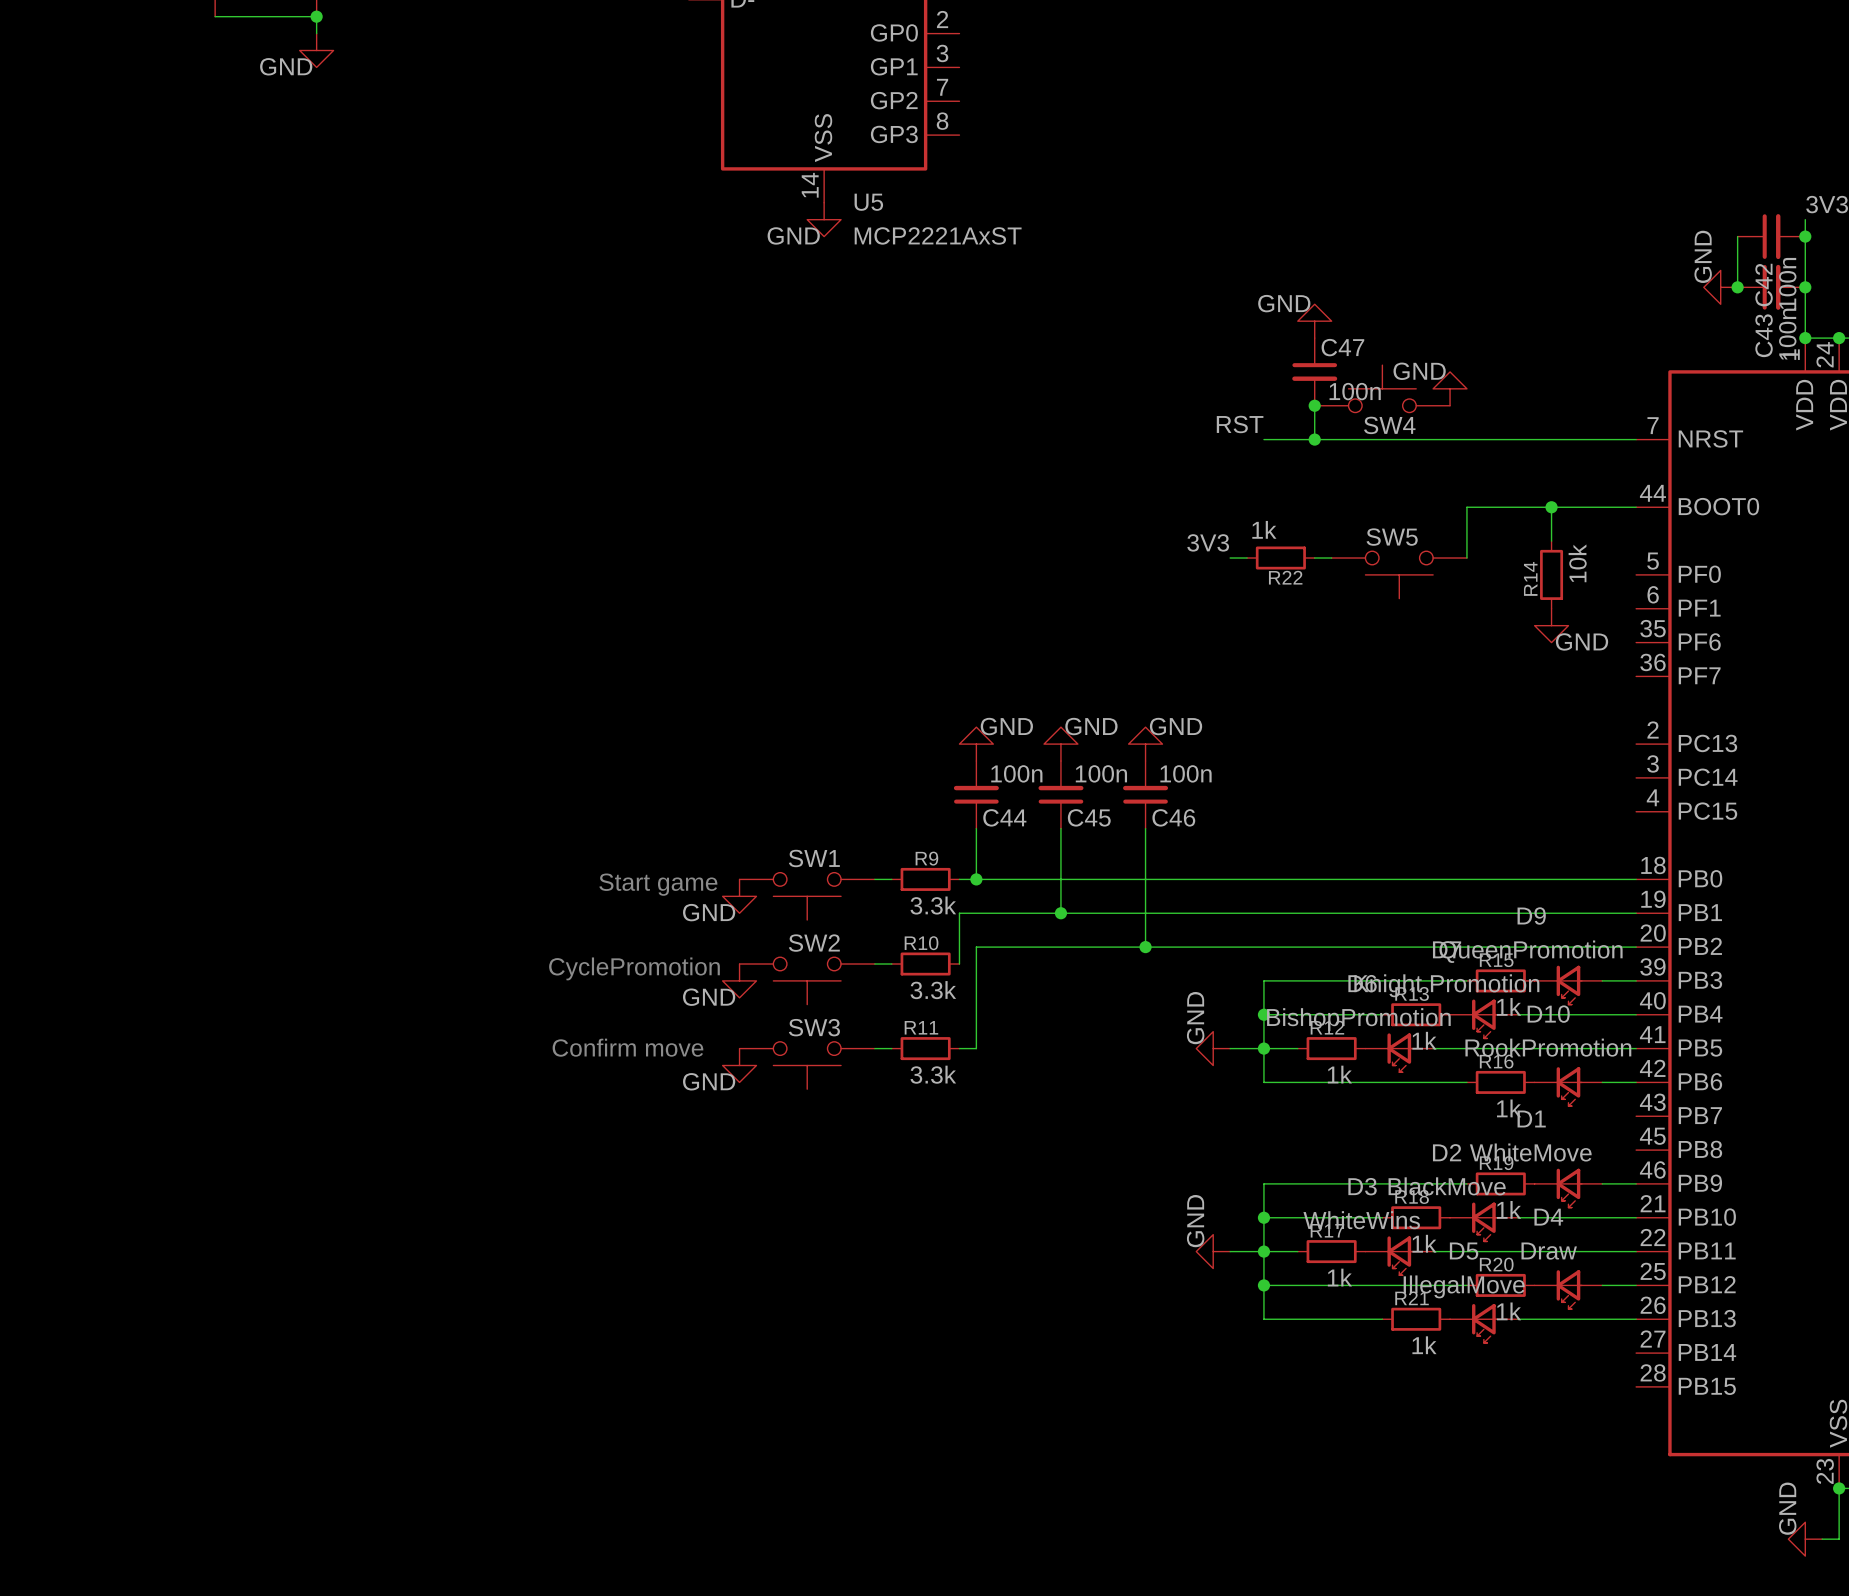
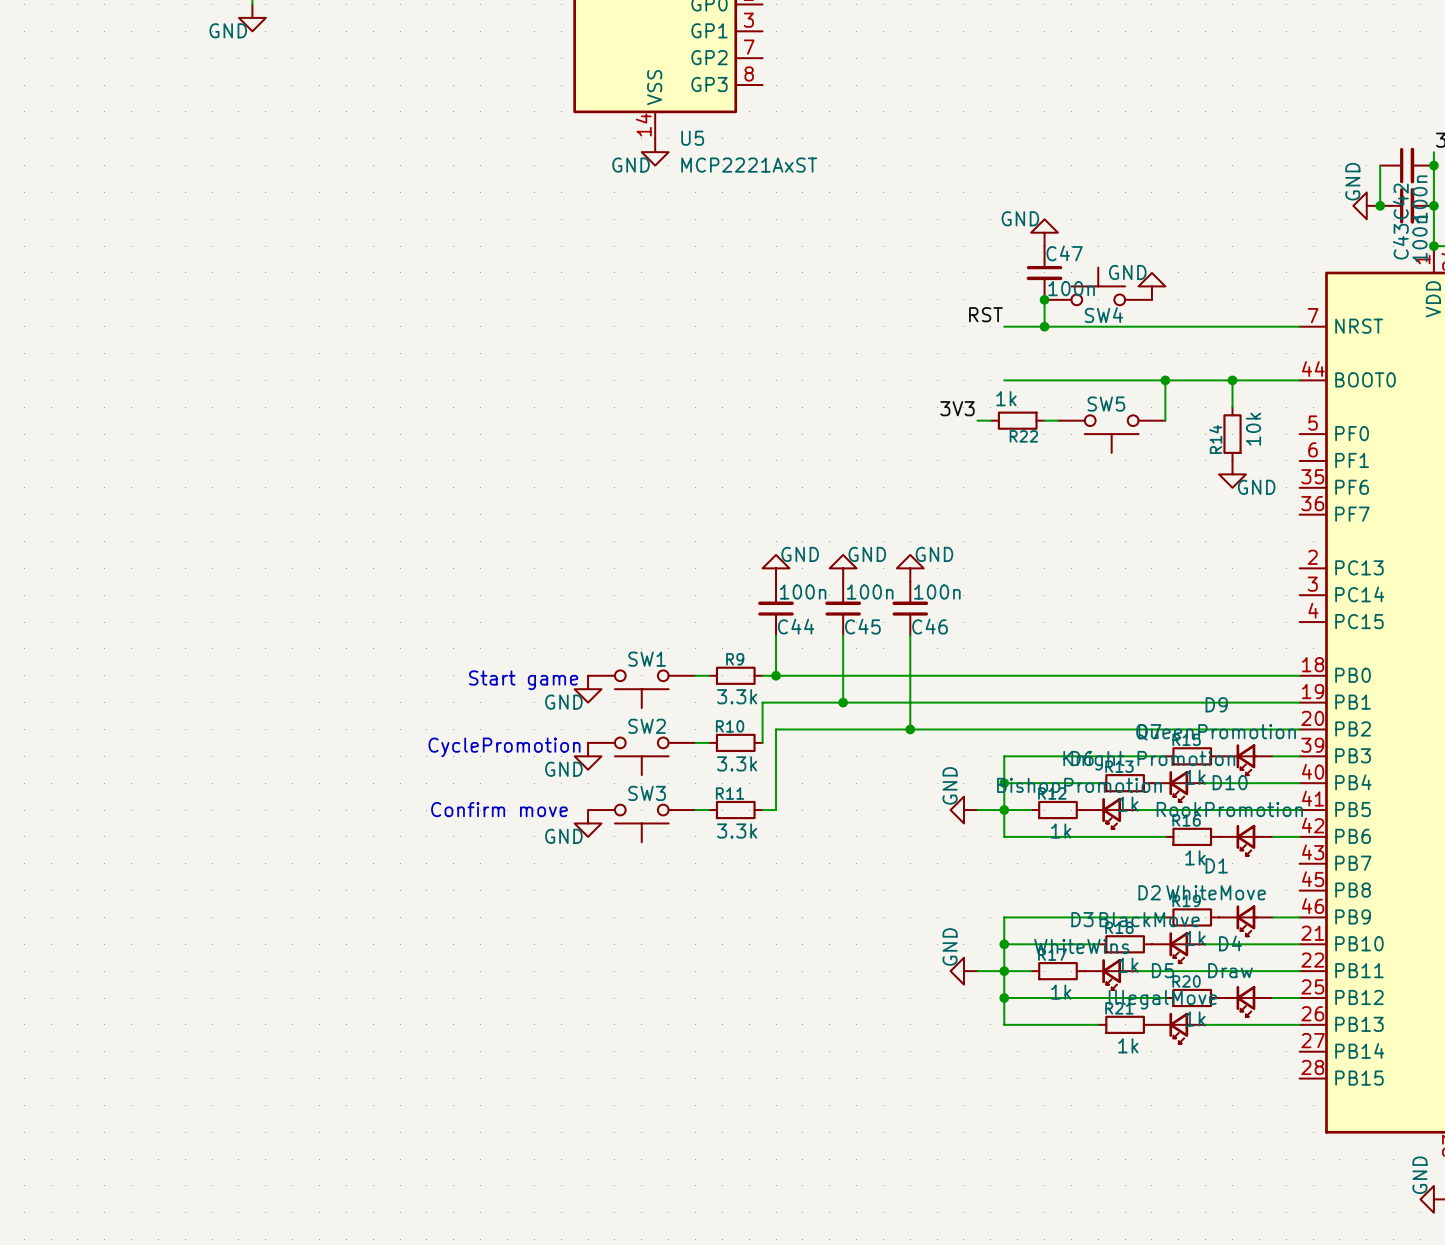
wire: none -> (1004, 380) (1165, 380)
junction: none -> (1165, 380)

